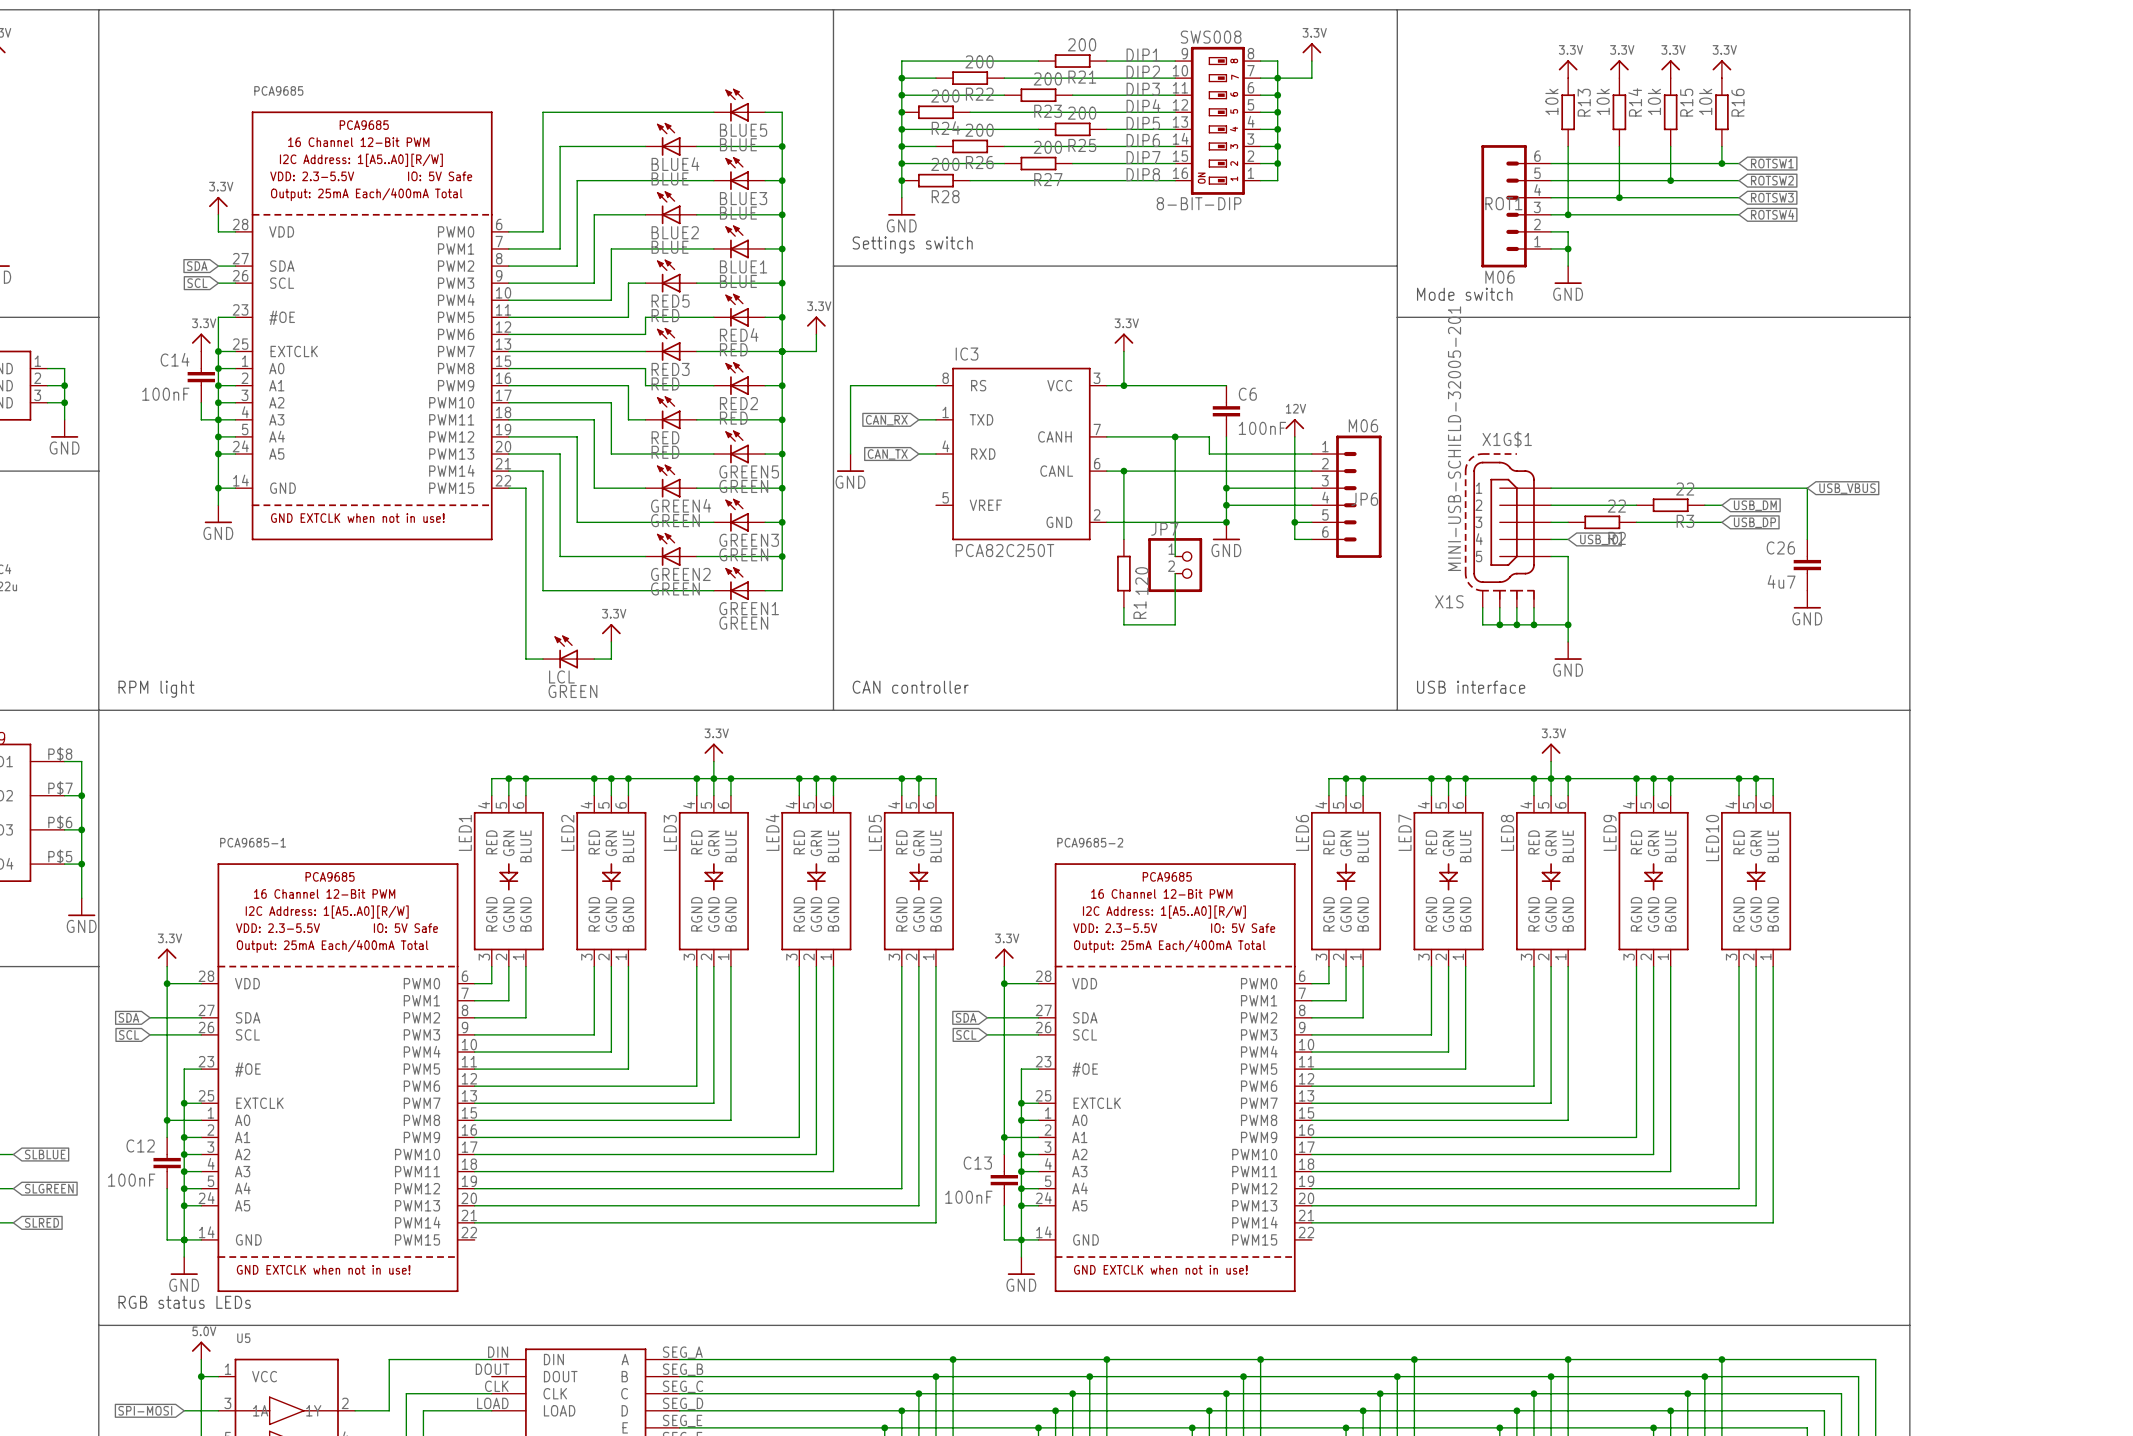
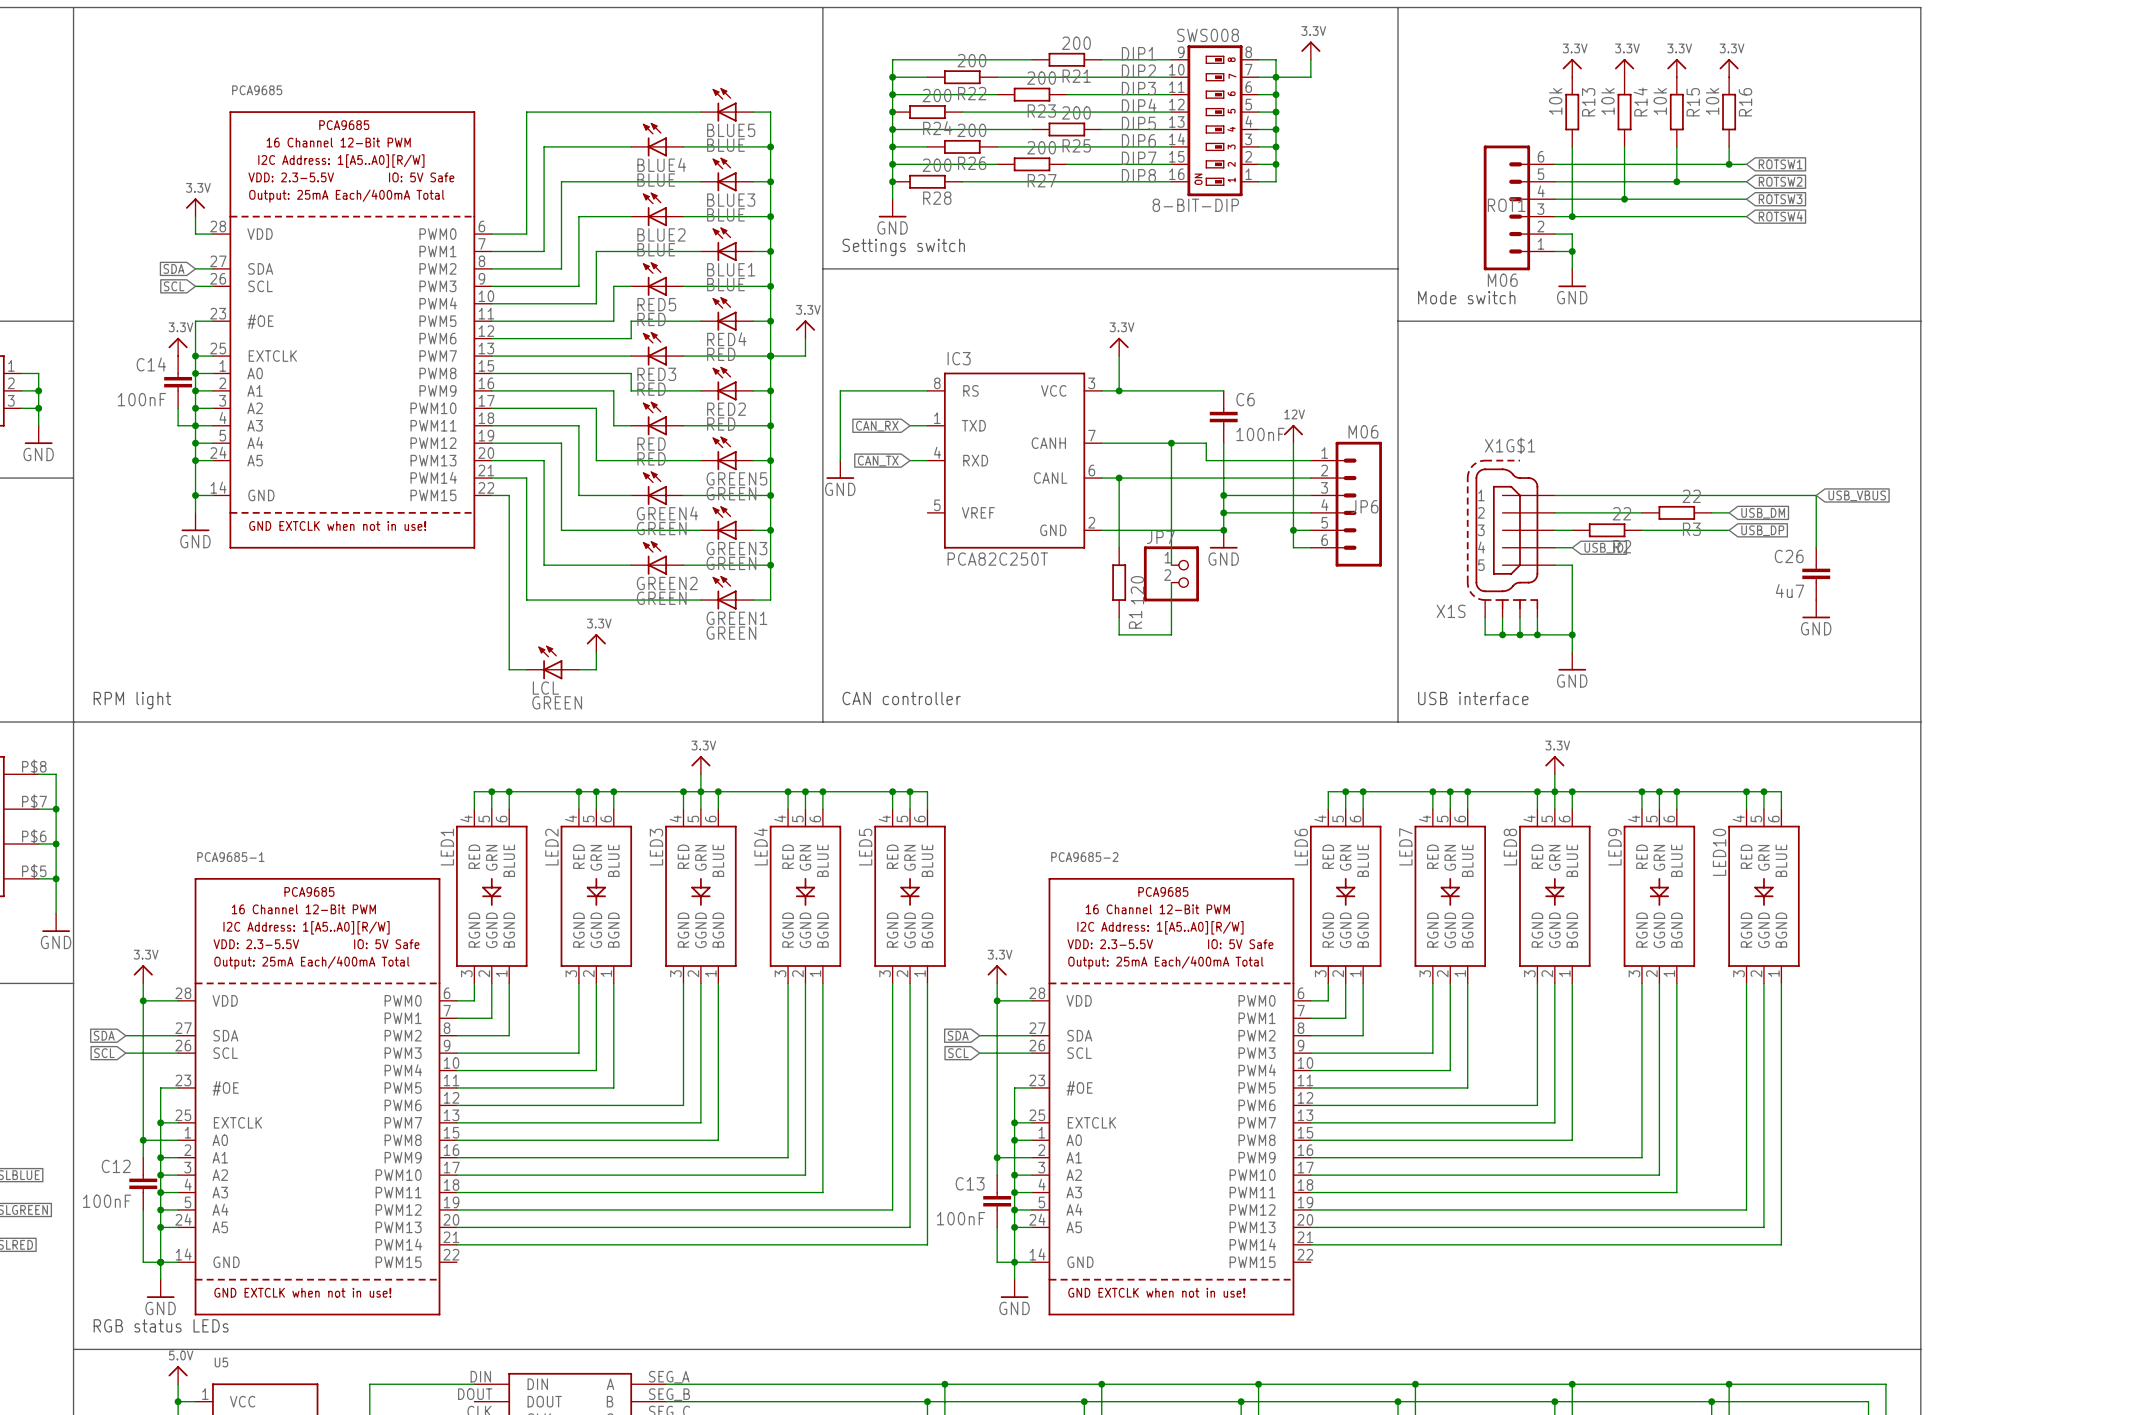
X1G$1 value: MINI-USB-SCHIELD-32005-201 (1454, 438) -> none

